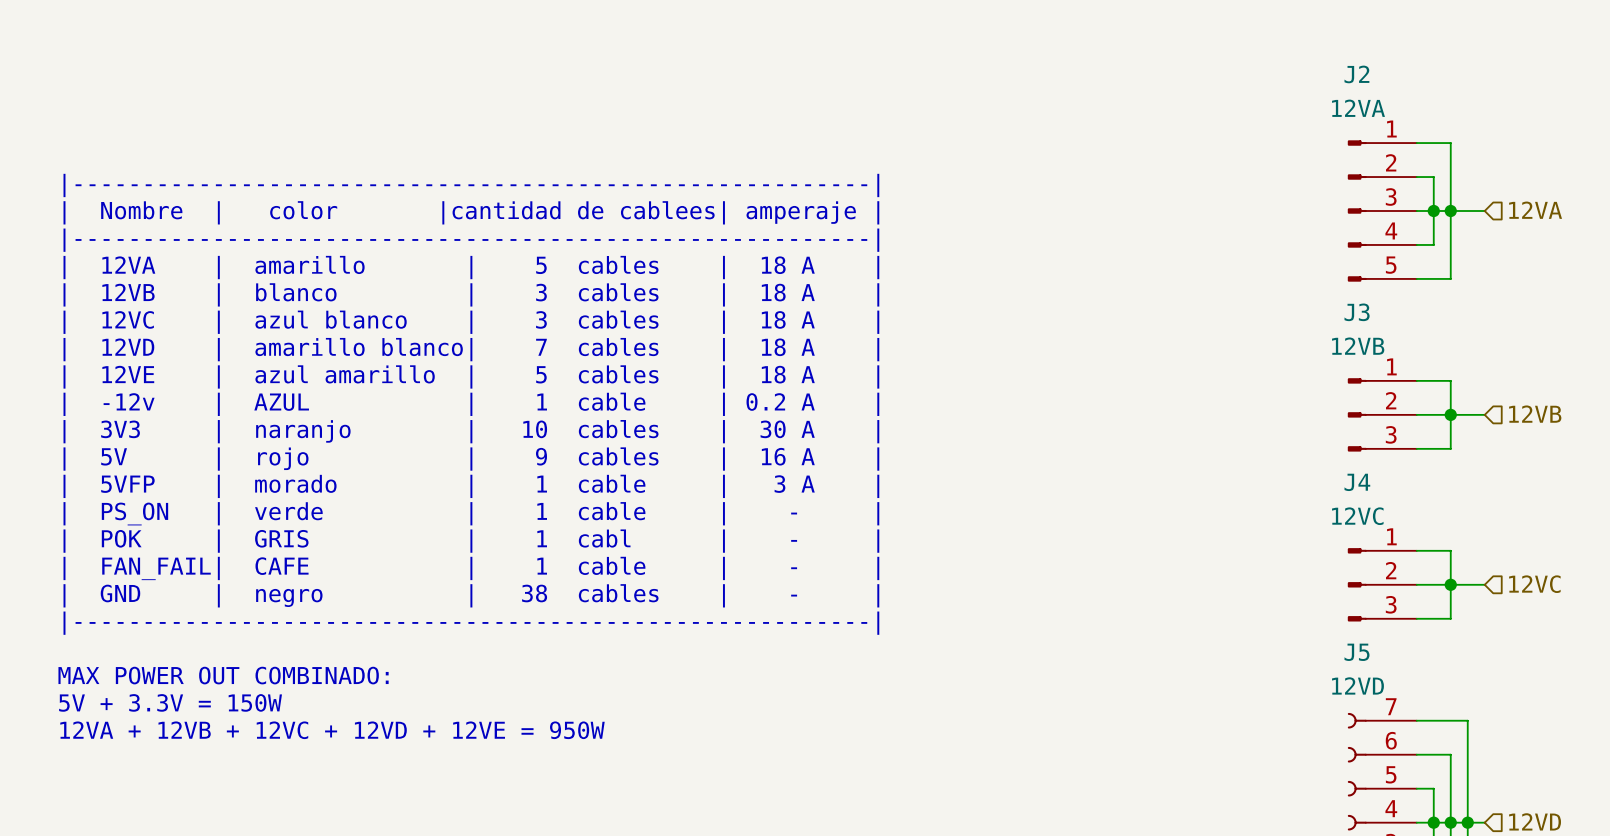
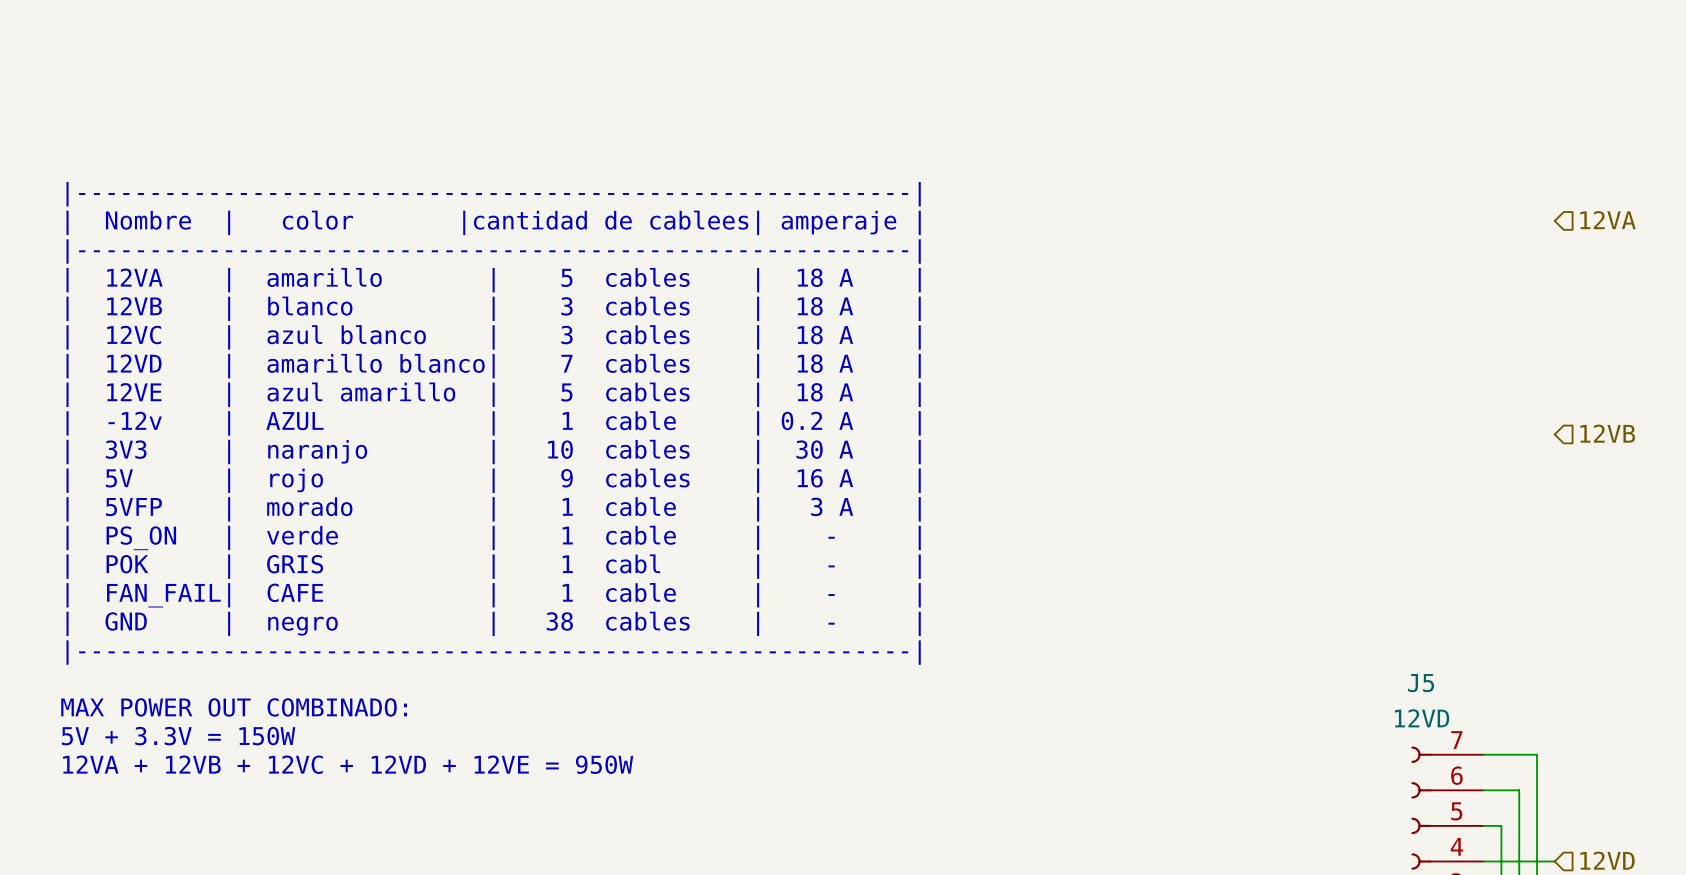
wire: (1416, 143) (1450, 143) (1450, 278) (1416, 278) -> none
wire: (1416, 177) (1433, 177) (1433, 244) (1416, 244) -> none
J2: 12VA (1382, 210) -> none
wire: (1416, 210) (1484, 210) -> none
junction: (1433, 210) -> none
junction: (1450, 210) -> none
wire: (1416, 380) (1450, 380) (1450, 448) (1416, 448) -> none
J3: 12VB (1382, 414) -> none
wire: (1416, 414) (1484, 414) -> none
junction: (1450, 414) -> none
wire: (1416, 550) (1450, 550) (1450, 618) (1416, 618) -> none
J4: 12VC (1382, 584) -> none
wire: (1416, 584) (1484, 584) -> none
junction: (1450, 584) -> none
hierarchical label: 12VC (1534, 584) -> none
junction: (1433, 822) -> none
junction: (1450, 822) -> none
junction: (1467, 822) -> none

